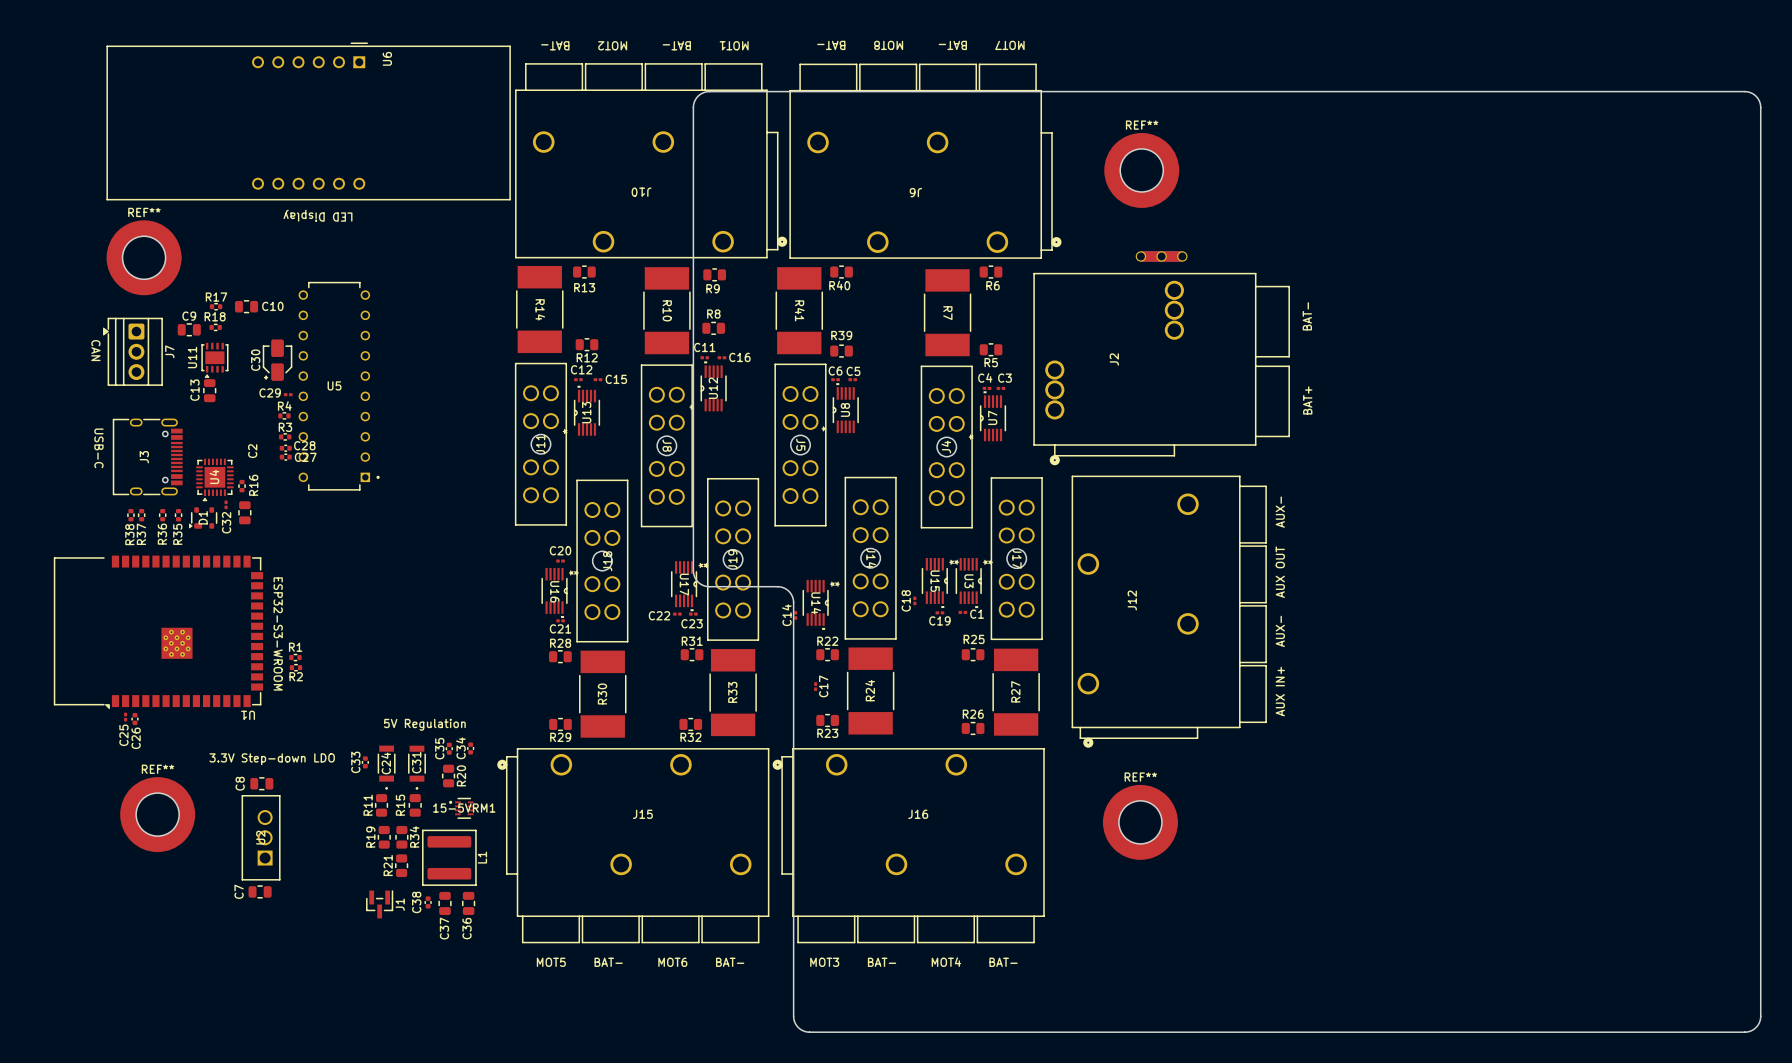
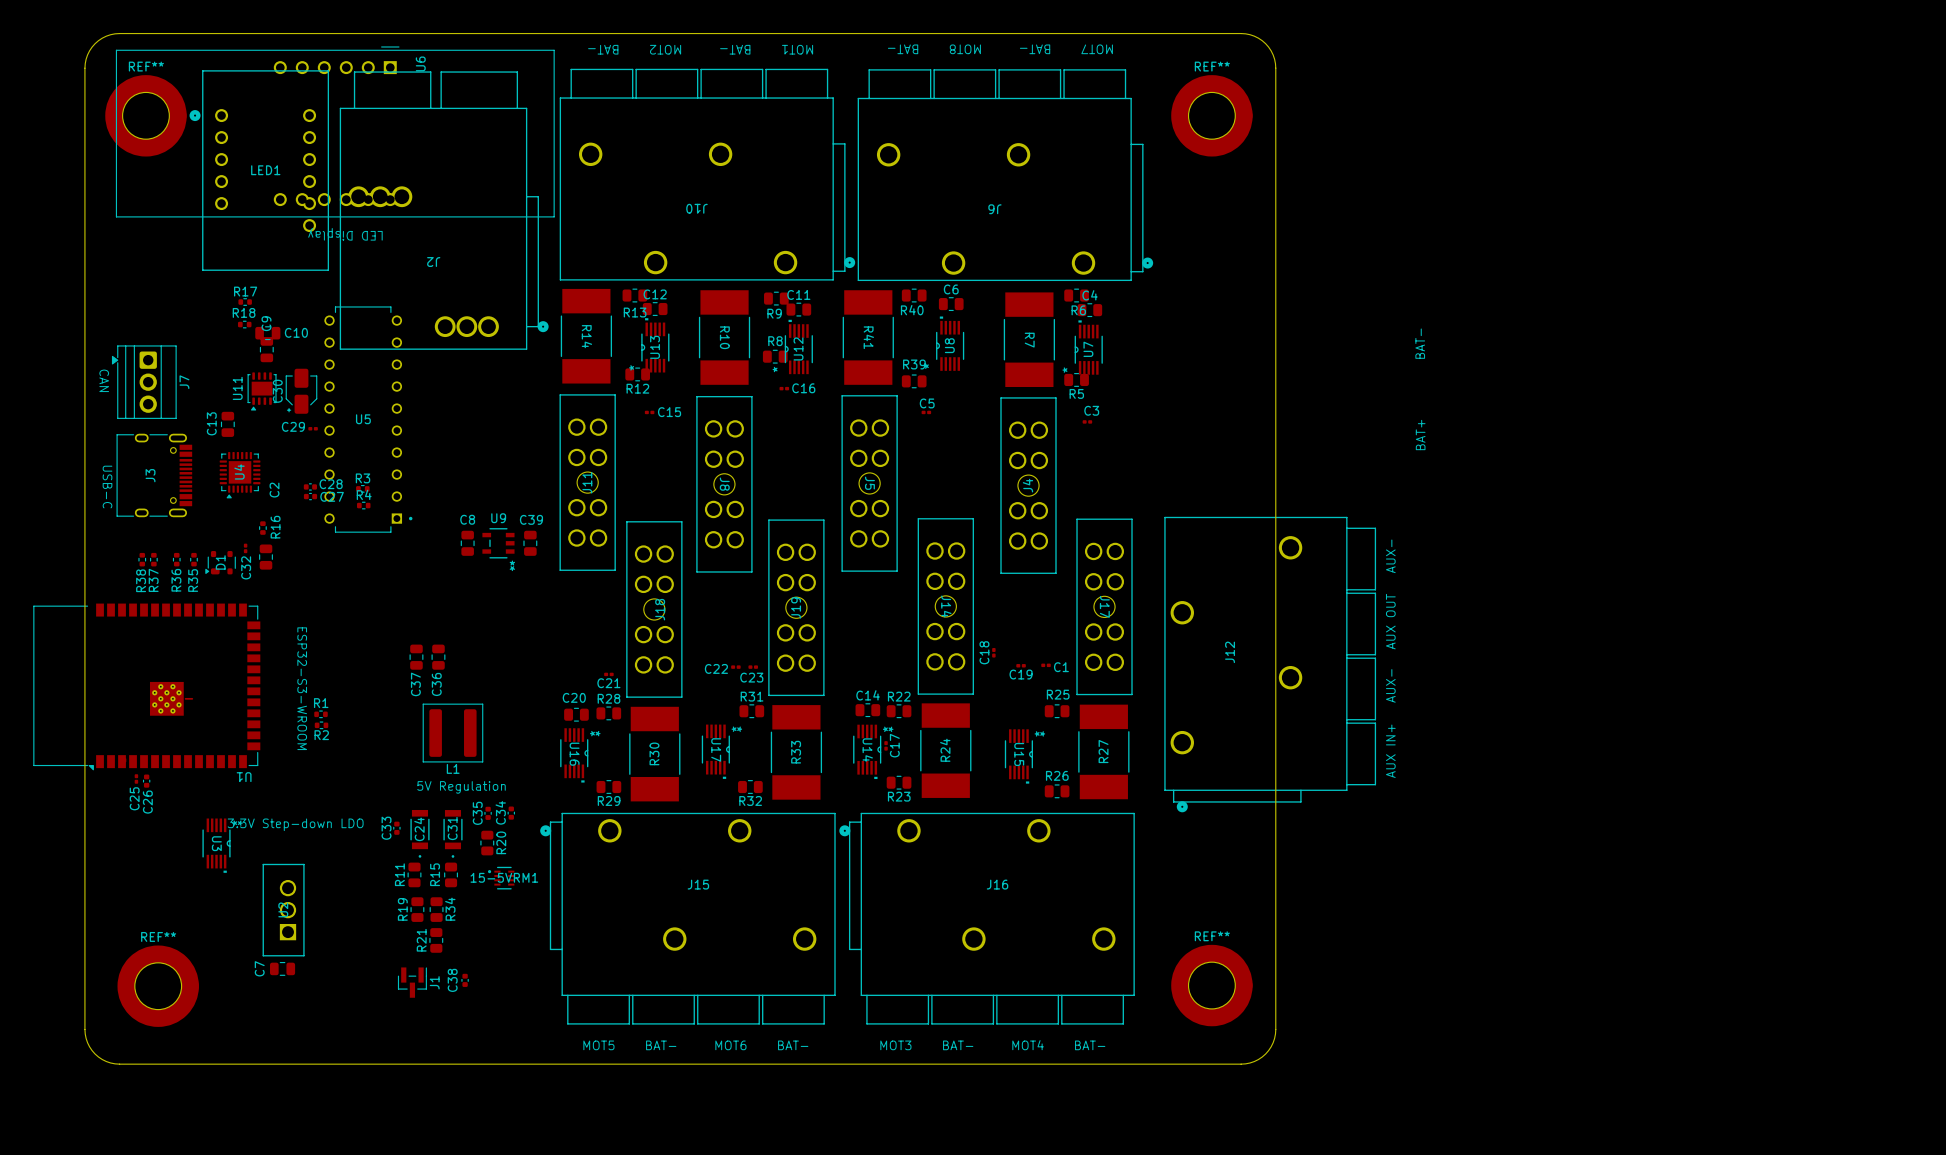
board edge: none -> (119, 33) (1241, 33) (1254, 36) (1265, 43) (1273, 54) (1275, 68) (1275, 1029) (1273, 1042) (1265, 1054) (1254, 1061) (1241, 1064) (119, 1064) (106, 1061) (95, 1054) (87, 1042) (84, 1029) (84, 68) (87, 54) (95, 43) (106, 36) (119, 33)
board edge: (709, 91) (1744, 91) (1754, 95) (1759, 100) (1760, 107) (1760, 1016) (1757, 1026) (1751, 1030) (1744, 1032) (809, 1032) (799, 1028) (795, 1023) (793, 1016) (793, 599) (787, 590) (779, 586) (705, 586) (696, 580) (693, 572) (693, 107) (698, 96) (709, 91) -> none
LED1: none -> (259, 170)
REF** position: (1141, 170) -> (1211, 115)
part: (1161, 256) -> none
REF** position: (144, 257) -> (145, 115)
R17 position: (216, 306) -> (245, 302)
R18 position: (215, 327) -> (244, 324)
C9 rotation: 0° (189, 329) -> 90° clockwise (266, 349)
C9 position: (189, 329) -> (266, 349)
C11 footprint: [700, 356, 710, 360] -> [786, 302, 812, 317]
U11 position: (214, 360) -> (262, 391)
J2 rotation: 0° (1161, 369) -> 90° counterclockwise (444, 210)
J2 position: (1161, 369) -> (444, 210)
C12 footprint: [574, 378, 583, 382] -> [642, 302, 668, 316]
C6 footprint: [831, 378, 840, 382] -> [938, 297, 964, 311]
U12 position: (713, 386) -> (798, 346)
C4 footprint: [982, 386, 992, 390] -> [1077, 303, 1103, 318]
U8 position: (845, 408) -> (950, 343)
U13 position: (586, 410) -> (655, 345)
R4 position: (284, 415) -> (363, 505)
U7 position: (993, 416) -> (1088, 347)
R3 position: (285, 436) -> (362, 488)
J3 position: (147, 456) -> (154, 475)
U4 position: (214, 479) -> (240, 475)
U9: none -> (498, 543)
C39: none -> (530, 543)
C20 footprint: [556, 559, 565, 563] -> [564, 707, 589, 722]
U15 position: (934, 582) -> (1018, 756)
U3 position: (968, 583) -> (216, 845)
U17 position: (684, 586) -> (715, 751)
U16 position: (554, 592) -> (574, 755)
U14 position: (815, 604) -> (867, 751)
C14 footprint: [794, 611, 798, 620] -> [855, 703, 881, 718]
U1 position: (158, 632) -> (146, 686)
top track: none -> (185, 698) (192, 698)
C8 rotation: 0° (261, 783) -> 90° clockwise (467, 543)
C8 position: (261, 783) -> (467, 543)
REF** position: (157, 814) -> (158, 986)
REF** position: (1140, 822) -> (1211, 985)
L1 rotation: 0° (449, 857) -> 90° clockwise (452, 733)
L1 position: (449, 857) -> (452, 733)
C37 position: (444, 903) -> (416, 657)
C36 position: (468, 903) -> (438, 657)

